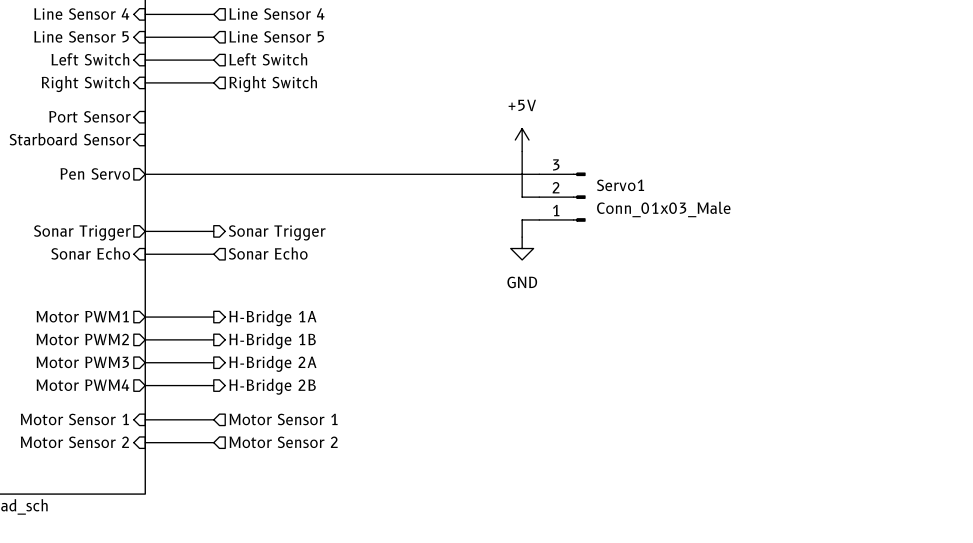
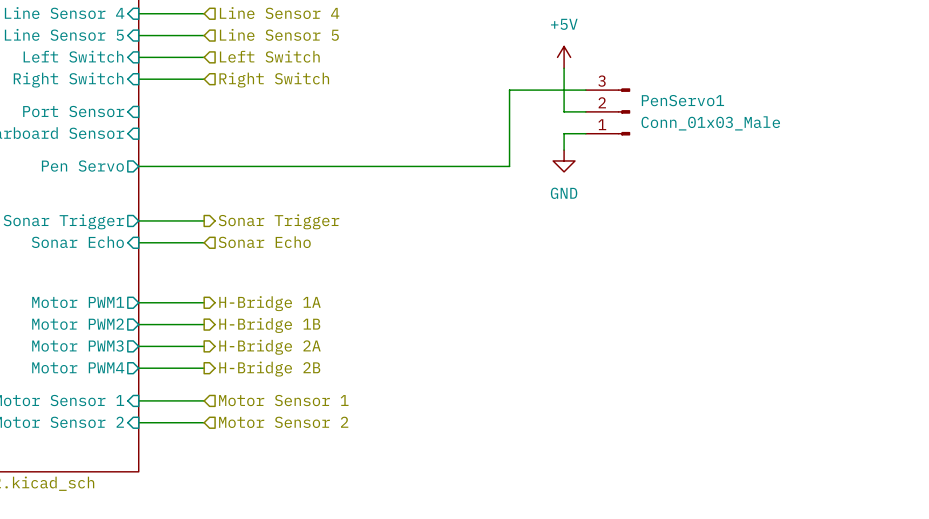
wire: none -> (564, 68) (564, 111) (585, 111)
PenServo1: none -> Conn_01x03_Male (608, 111)
power symbol position: +5V (522, 140) -> +5V (564, 57)
wire: none -> (585, 133) (564, 133) (564, 150)
wire: (522, 151) (522, 197) (539, 197) -> none
wire: (533, 174) (539, 174) -> (509, 166) (509, 90) (585, 90)
Servo1: Conn_01x03_Male (562, 197) -> none
wire: (539, 219) (522, 219) (522, 237) -> none
power symbol position: GND (522, 248) -> GND (564, 160)

